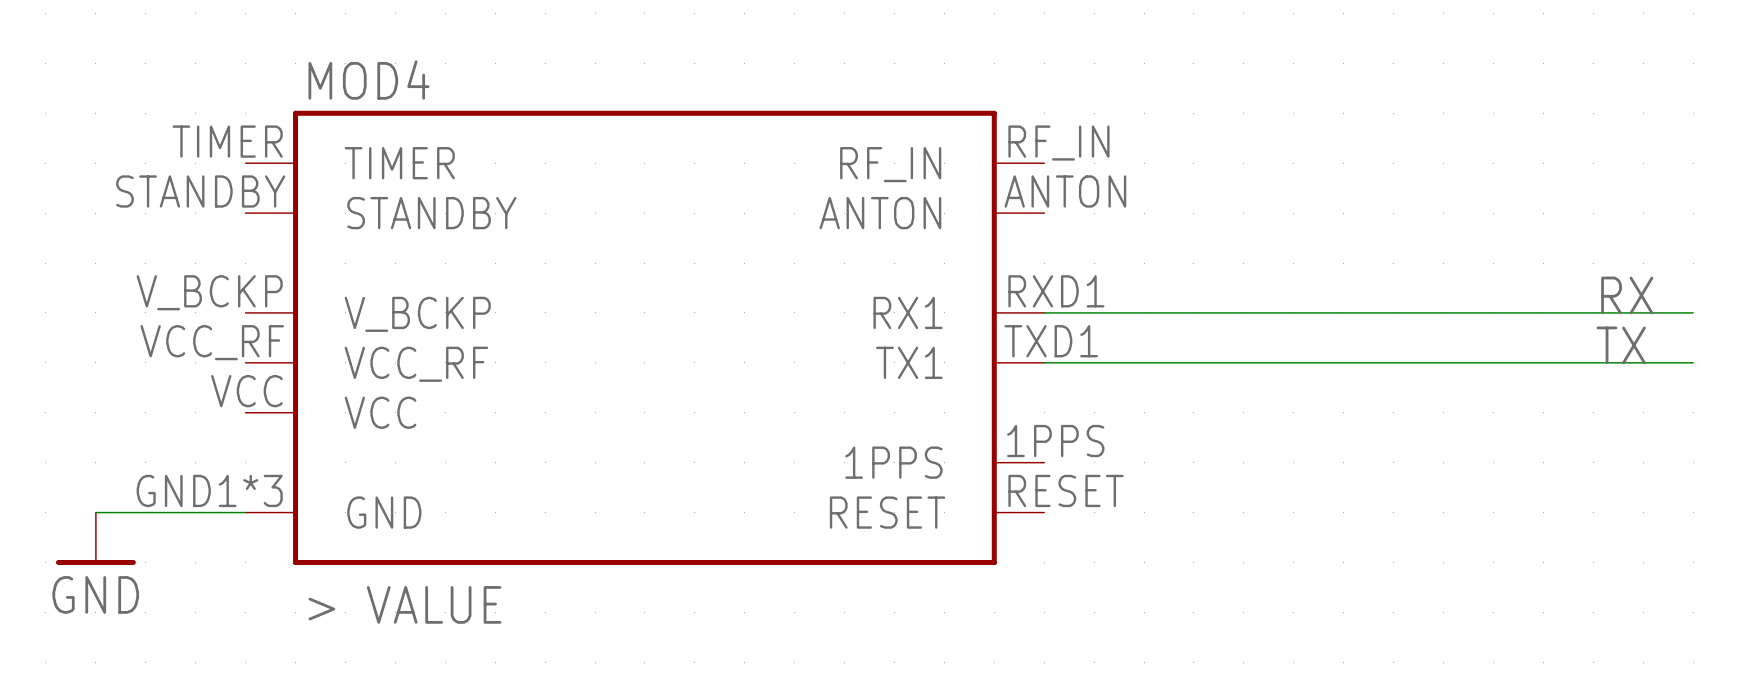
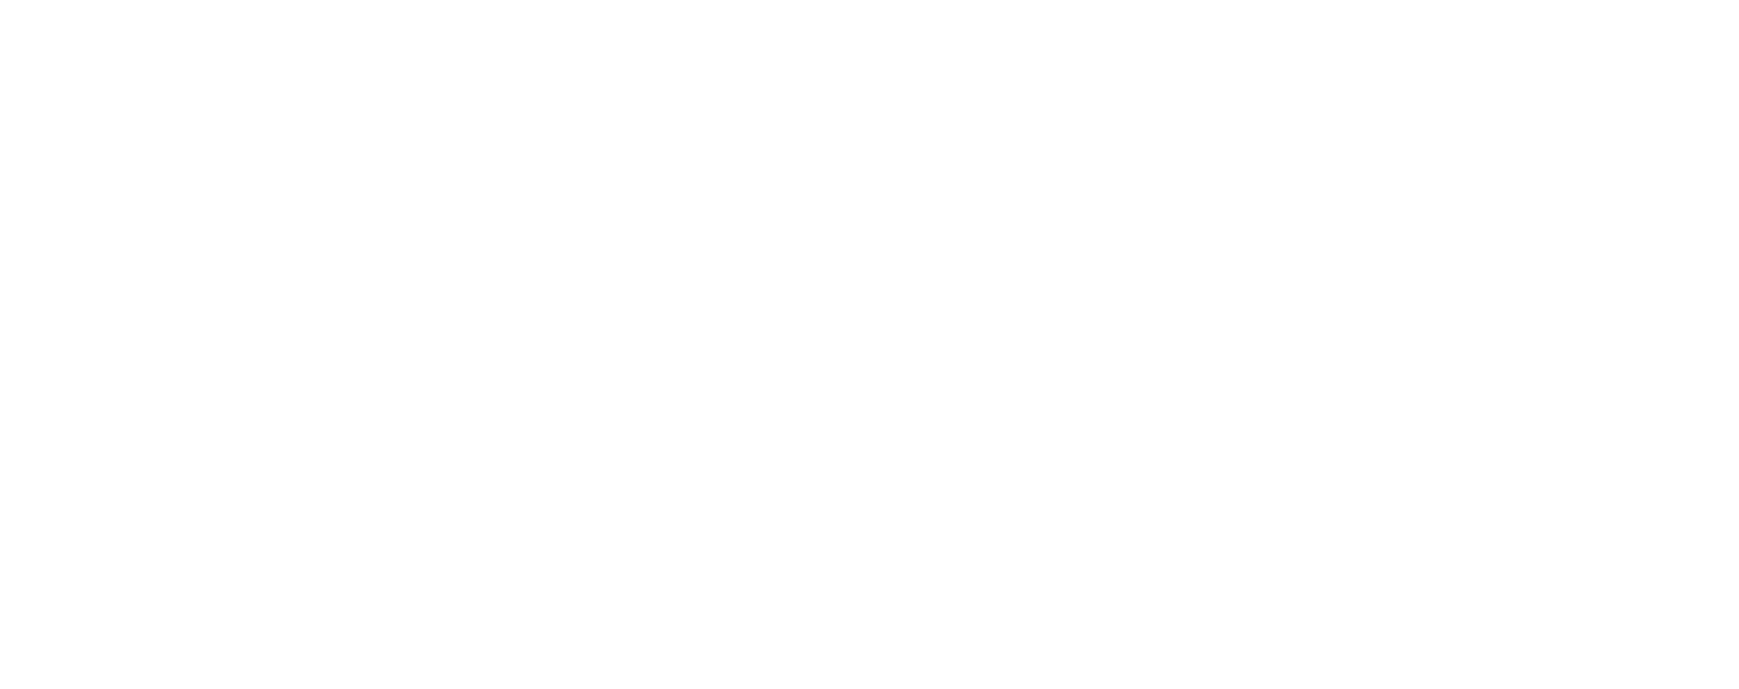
label: RX (1627, 295) -> none
wire: (1044, 312) (1693, 312) -> none
MOD4: (644, 337) -> none
label: TX (1621, 345) -> none
wire: (1044, 362) (1693, 362) -> none
wire: (95, 512) (245, 512) -> none
power symbol: GND (95, 538) -> none

